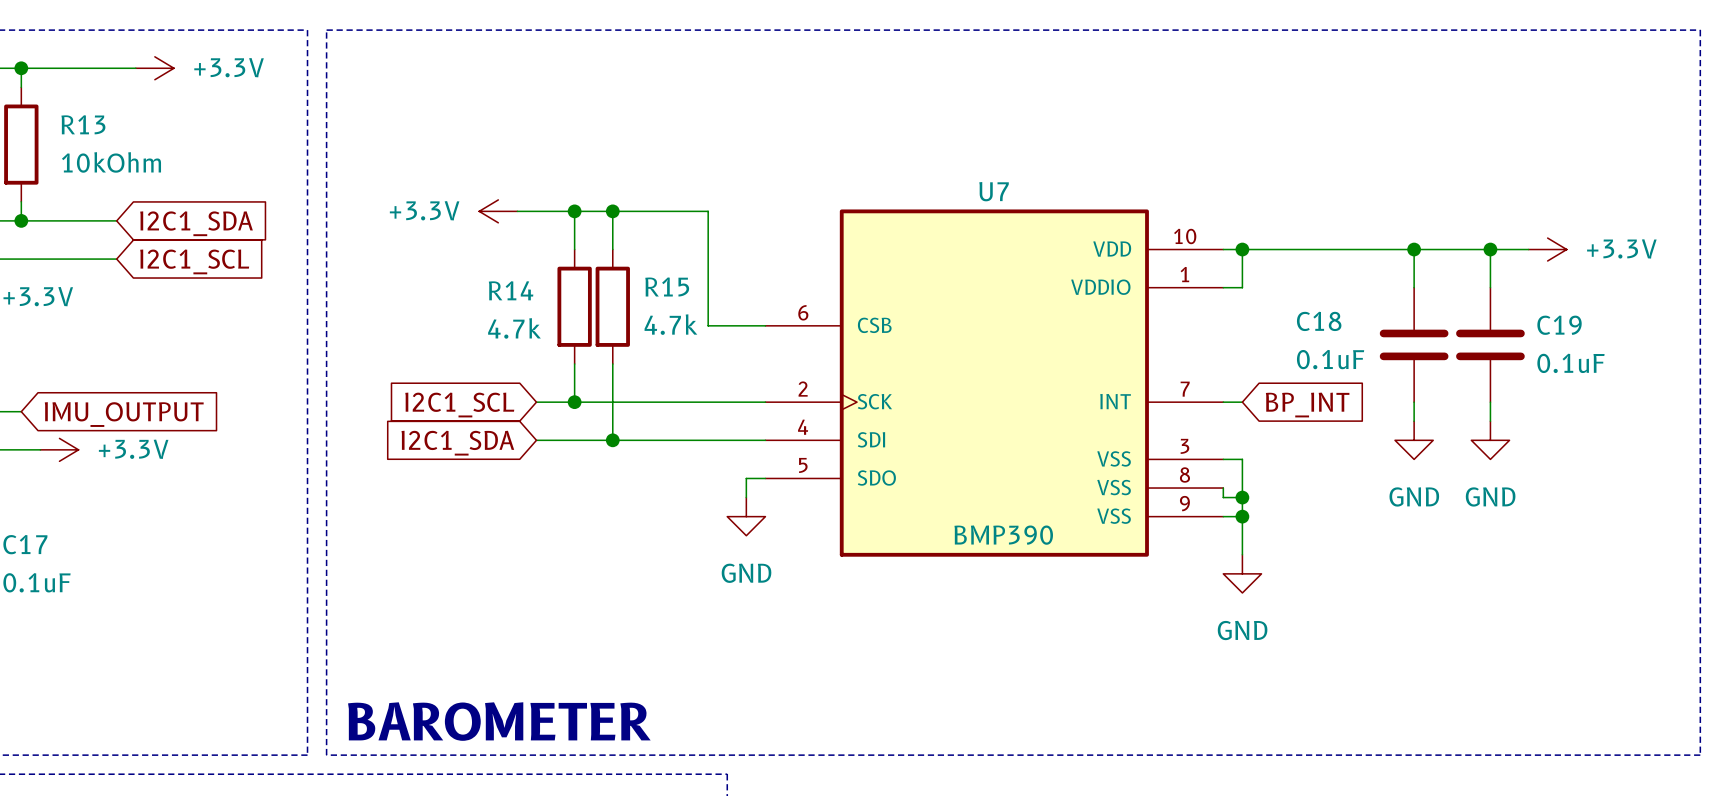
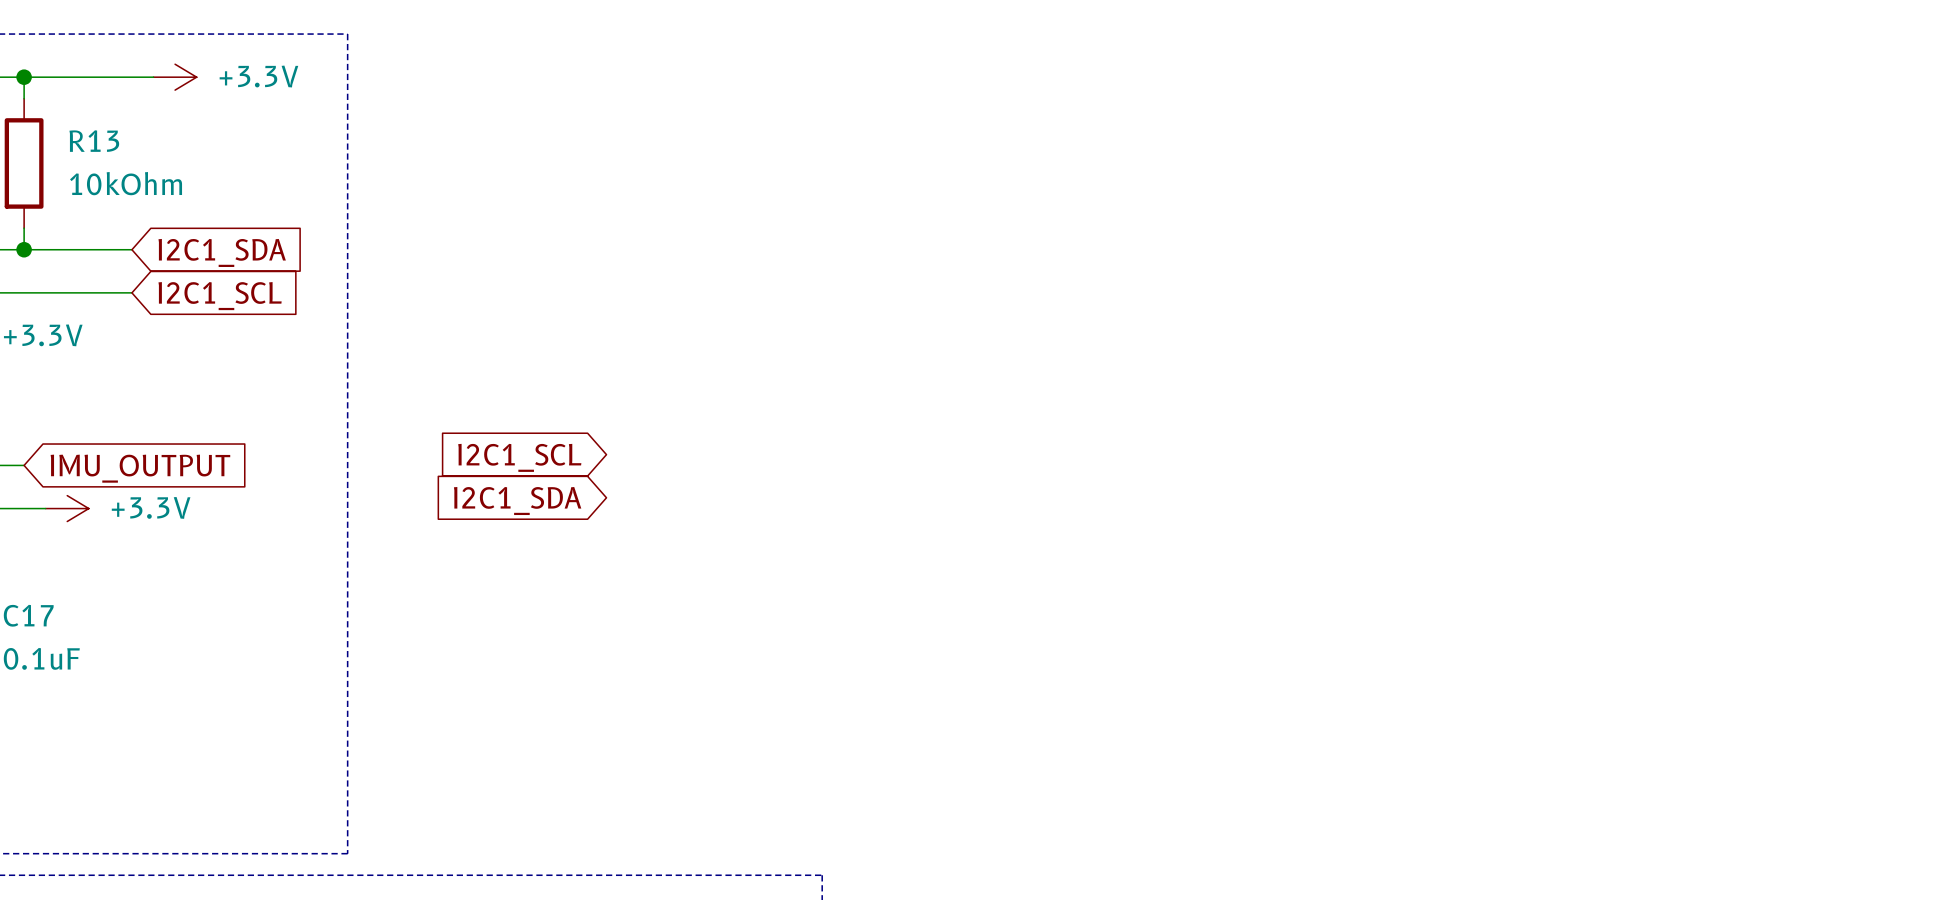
line: (326, 30) (1700, 30) (1700, 755) (326, 755) (326, 30) -> none
power symbol: +3.3V (498, 211) -> none
wire: (517, 211) (708, 211) (708, 325) (765, 325) -> none
wire: (574, 211) (574, 249) -> none
junction: (574, 211) -> none
wire: (612, 211) (612, 249) -> none
junction: (612, 211) -> none
wire: (1223, 249) (1528, 249) -> none
wire: (1242, 249) (1242, 287) (1223, 287) -> none
junction: (1242, 249) -> none
wire: (1414, 249) (1414, 287) -> none
junction: (1414, 249) -> none
wire: (1490, 249) (1490, 287) -> none
junction: (1490, 249) -> none
power symbol: +3.3V (1547, 249) -> none
R14: 4.7k (574, 306) -> none
R15: 4.7k (612, 306) -> none
C18: 0.1uF (1414, 344) -> none
C19: 0.1uF (1490, 344) -> none
wire: (574, 364) (574, 402) -> none
wire: (612, 364) (612, 440) -> none
U7: BMP390 (994, 383) -> none
wire: (536, 402) (765, 402) -> none
junction: (574, 402) -> none
wire: (1223, 402) (1242, 402) -> none
wire: (1414, 402) (1414, 421) -> none
wire: (1490, 402) (1490, 421) -> none
global label: BP_INT (1307, 405) -> none
wire: (536, 440) (765, 440) -> none
junction: (612, 440) -> none
power symbol: GND (1414, 440) -> none
power symbol: GND (1490, 440) -> none
wire: (1223, 459) (1242, 459) (1242, 554) -> none
wire: (765, 478) (746, 478) (746, 497) -> none
wire: (1223, 488) (1223, 497) (1242, 497) -> none
junction: (1242, 497) -> none
power symbol: GND (746, 516) -> none
wire: (1223, 516) (1242, 516) -> none
junction: (1242, 516) -> none
power symbol: GND (1242, 573) -> none
text: BAROMETER (499, 721) -> none

